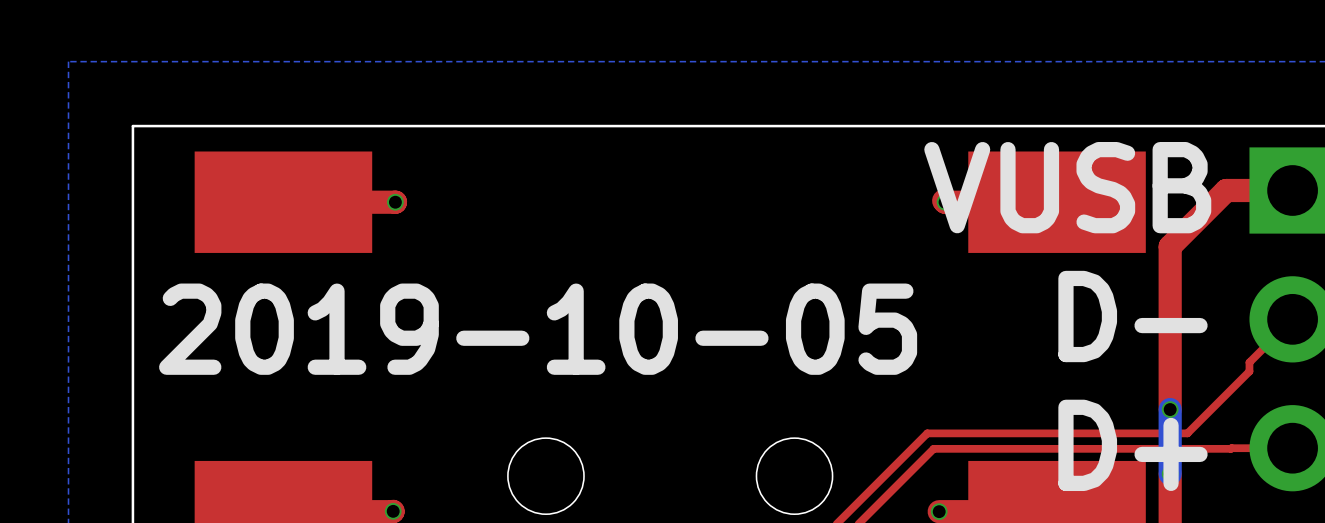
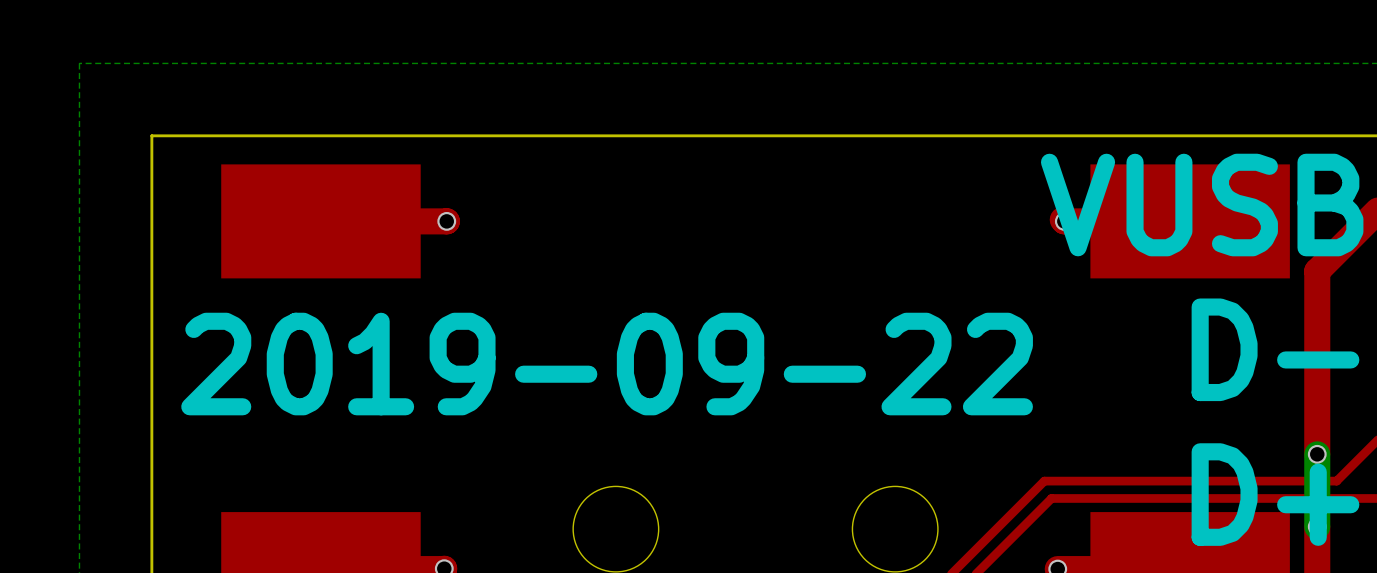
text: 2019-10-05 (538, 329) -> 2019-09-22 (607, 364)

